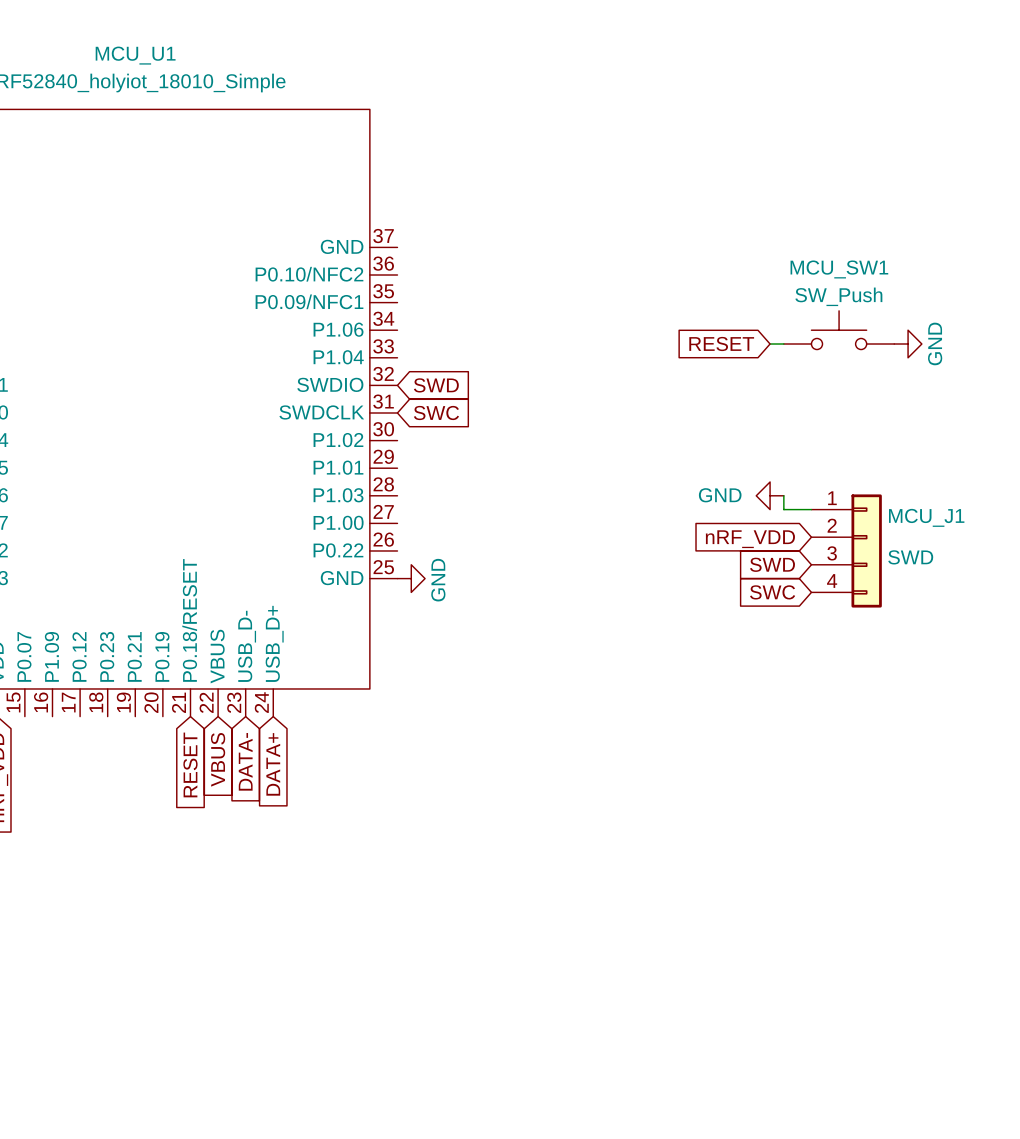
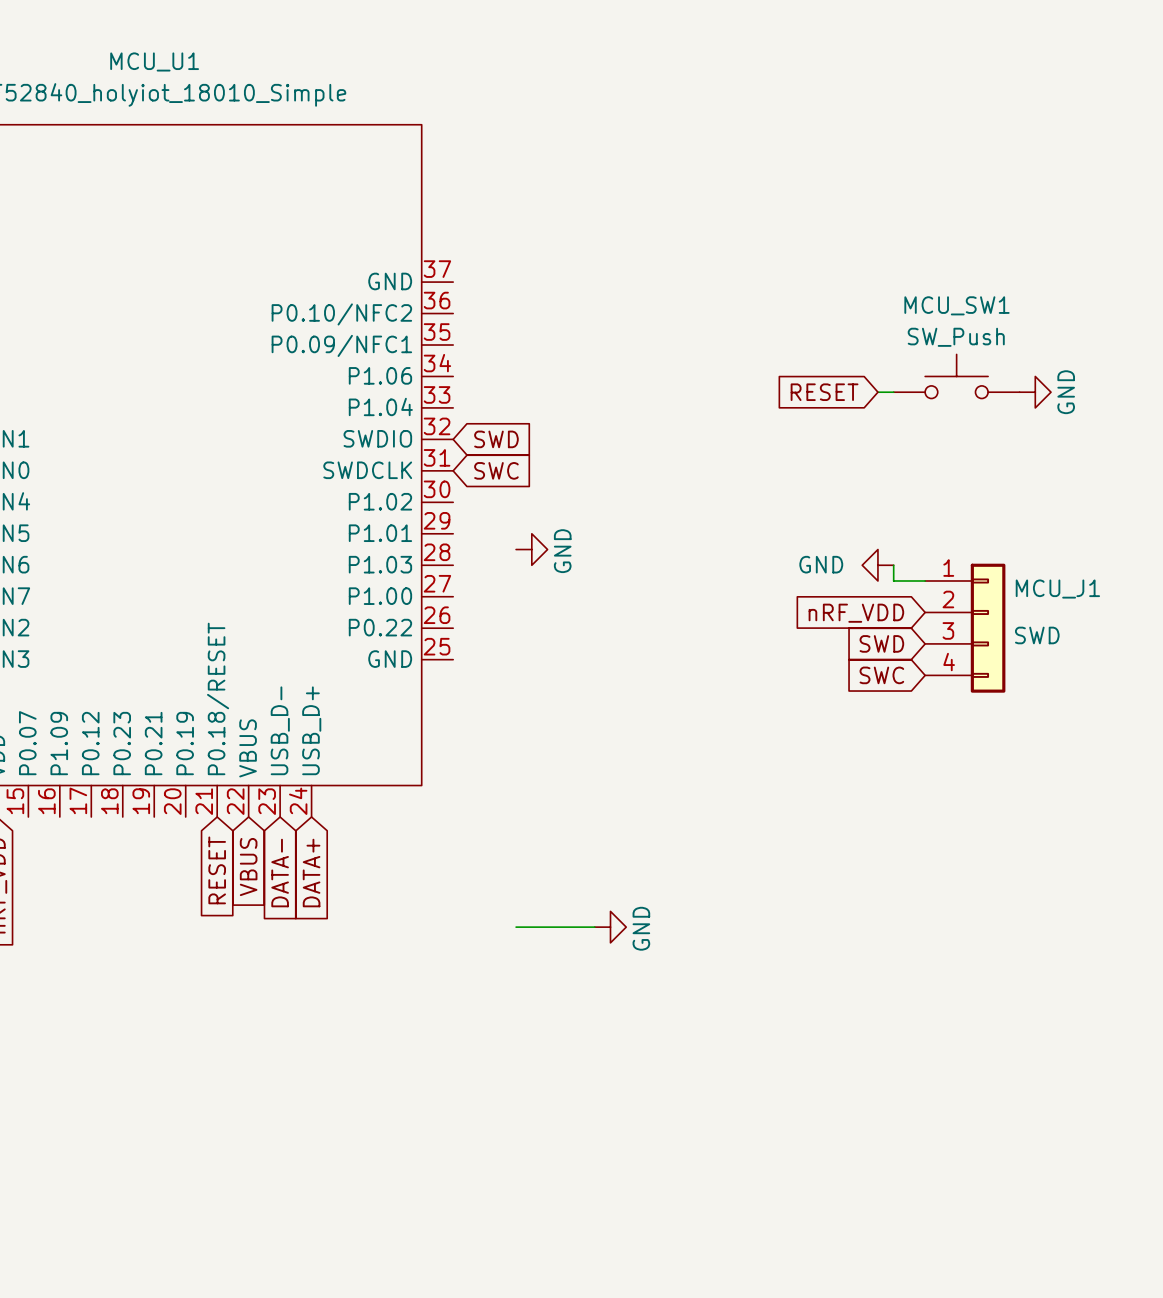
power symbol position: GND (411, 578) -> GND (531, 549)
wire: none -> (516, 927) (594, 927)
power symbol: none -> GND (610, 927)

